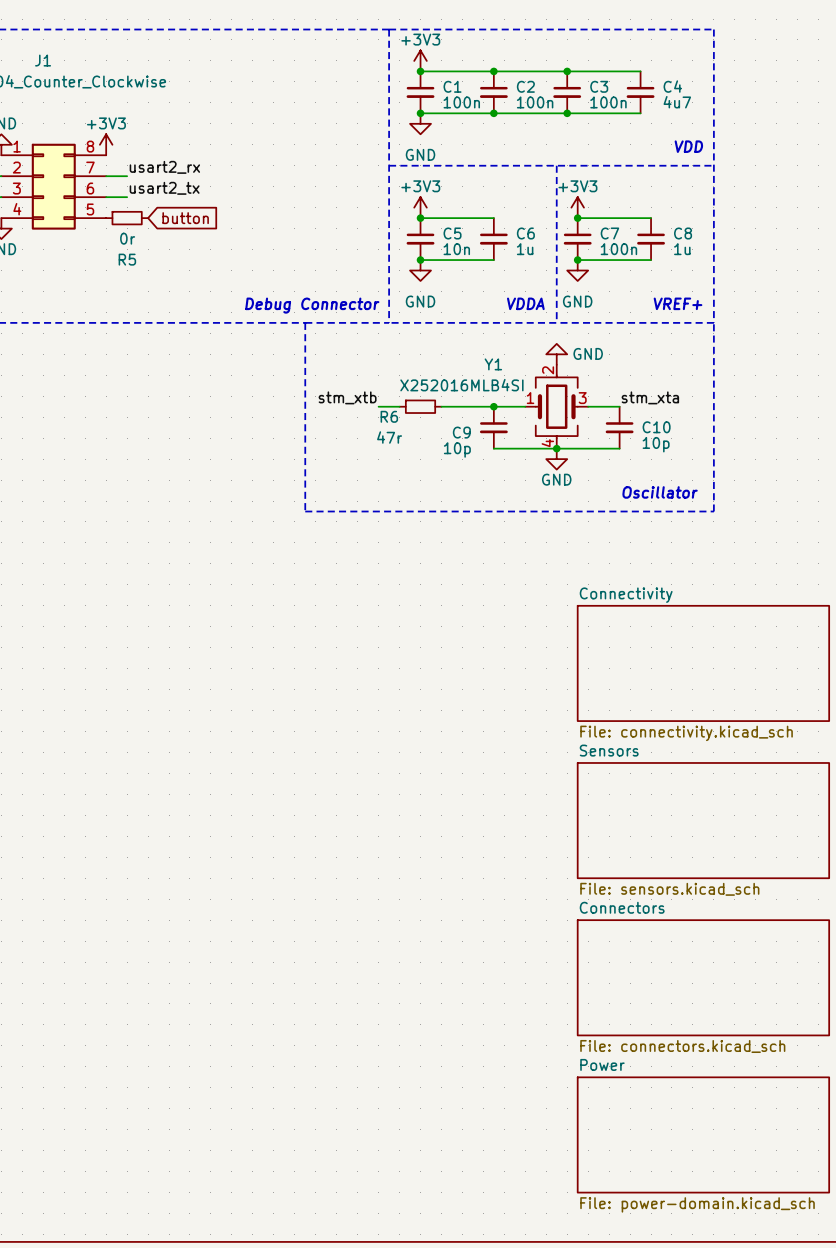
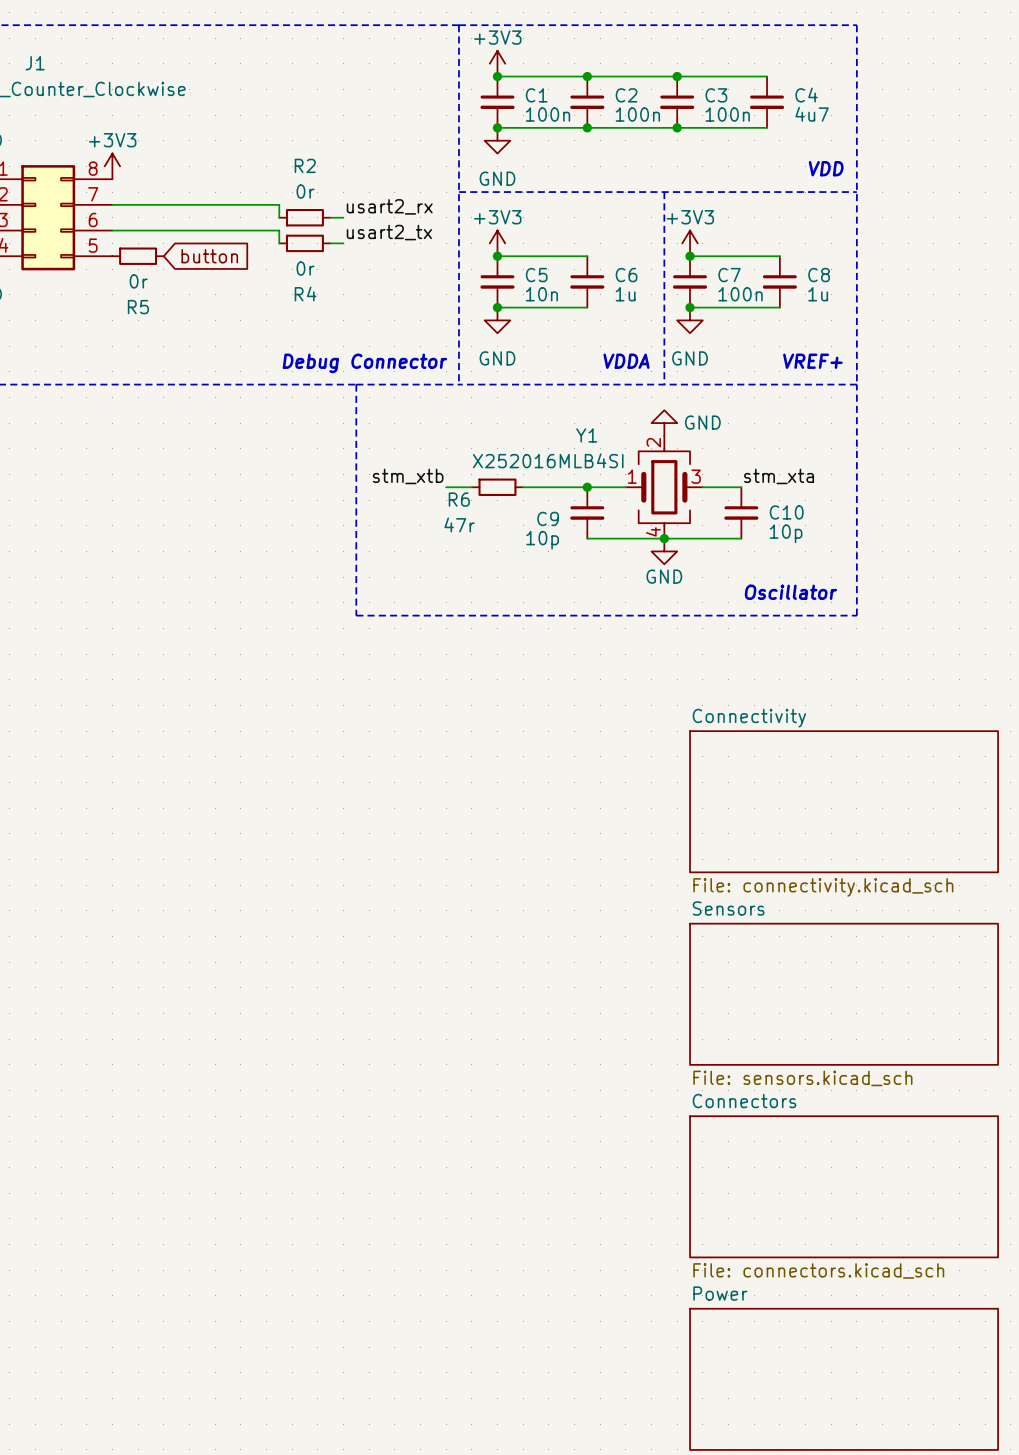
label position: usart2_rx (164, 167) -> usart2_rx (389, 206)
wire: none -> (138, 204) (279, 204) (279, 217)
R2: none -> 0r (304, 217)
wire: none -> (330, 217) (343, 217)
label position: usart2_tx (164, 188) -> usart2_tx (389, 232)
wire: none -> (138, 230) (279, 230) (279, 243)
R4: none -> 0r (304, 243)
wire: none -> (330, 243) (343, 243)

